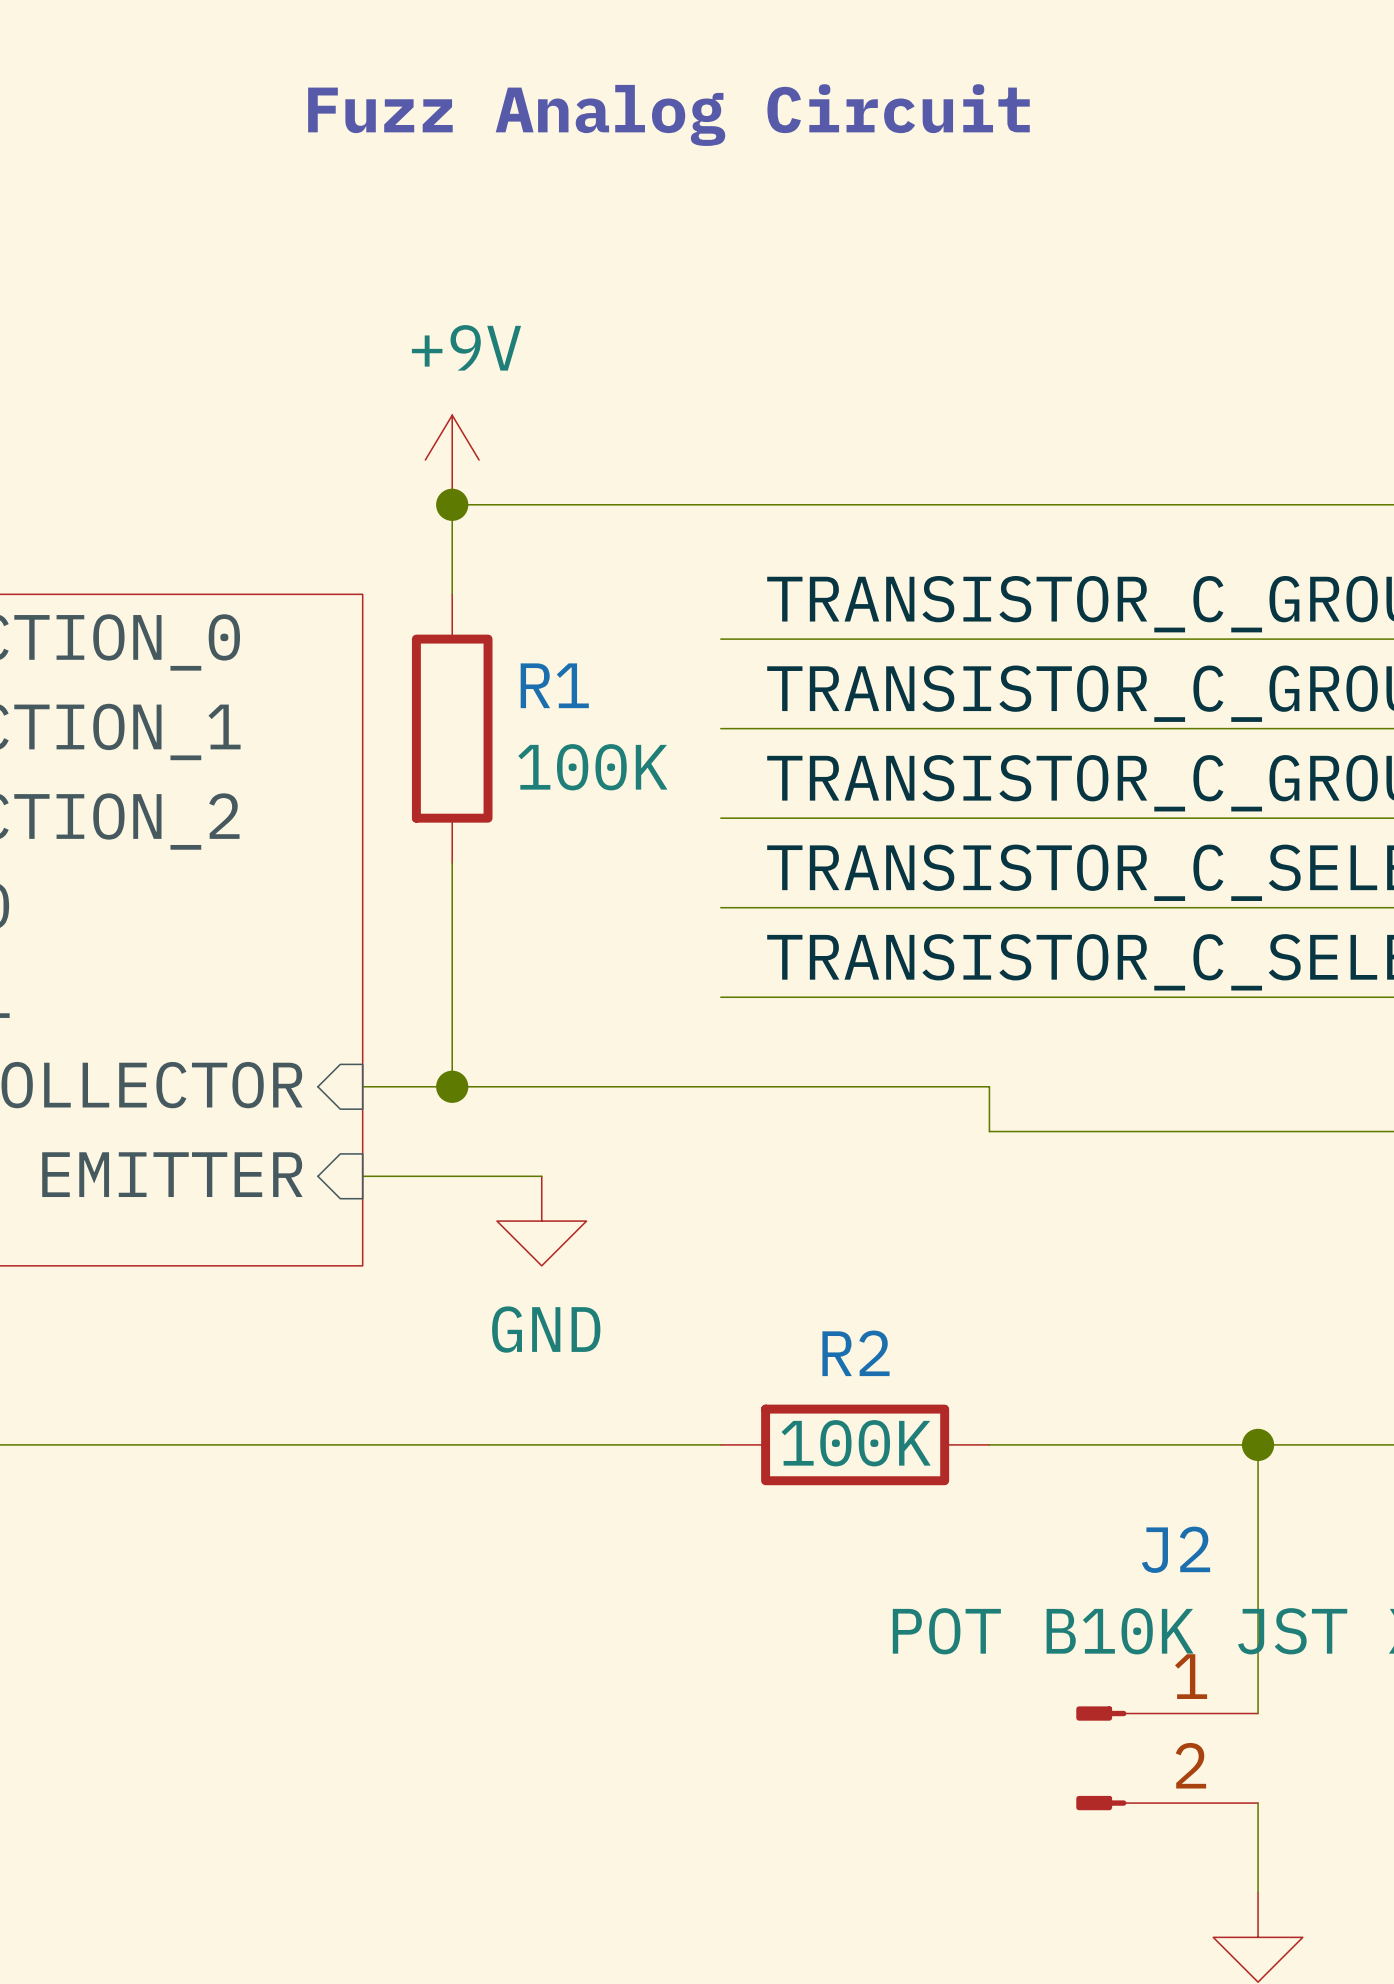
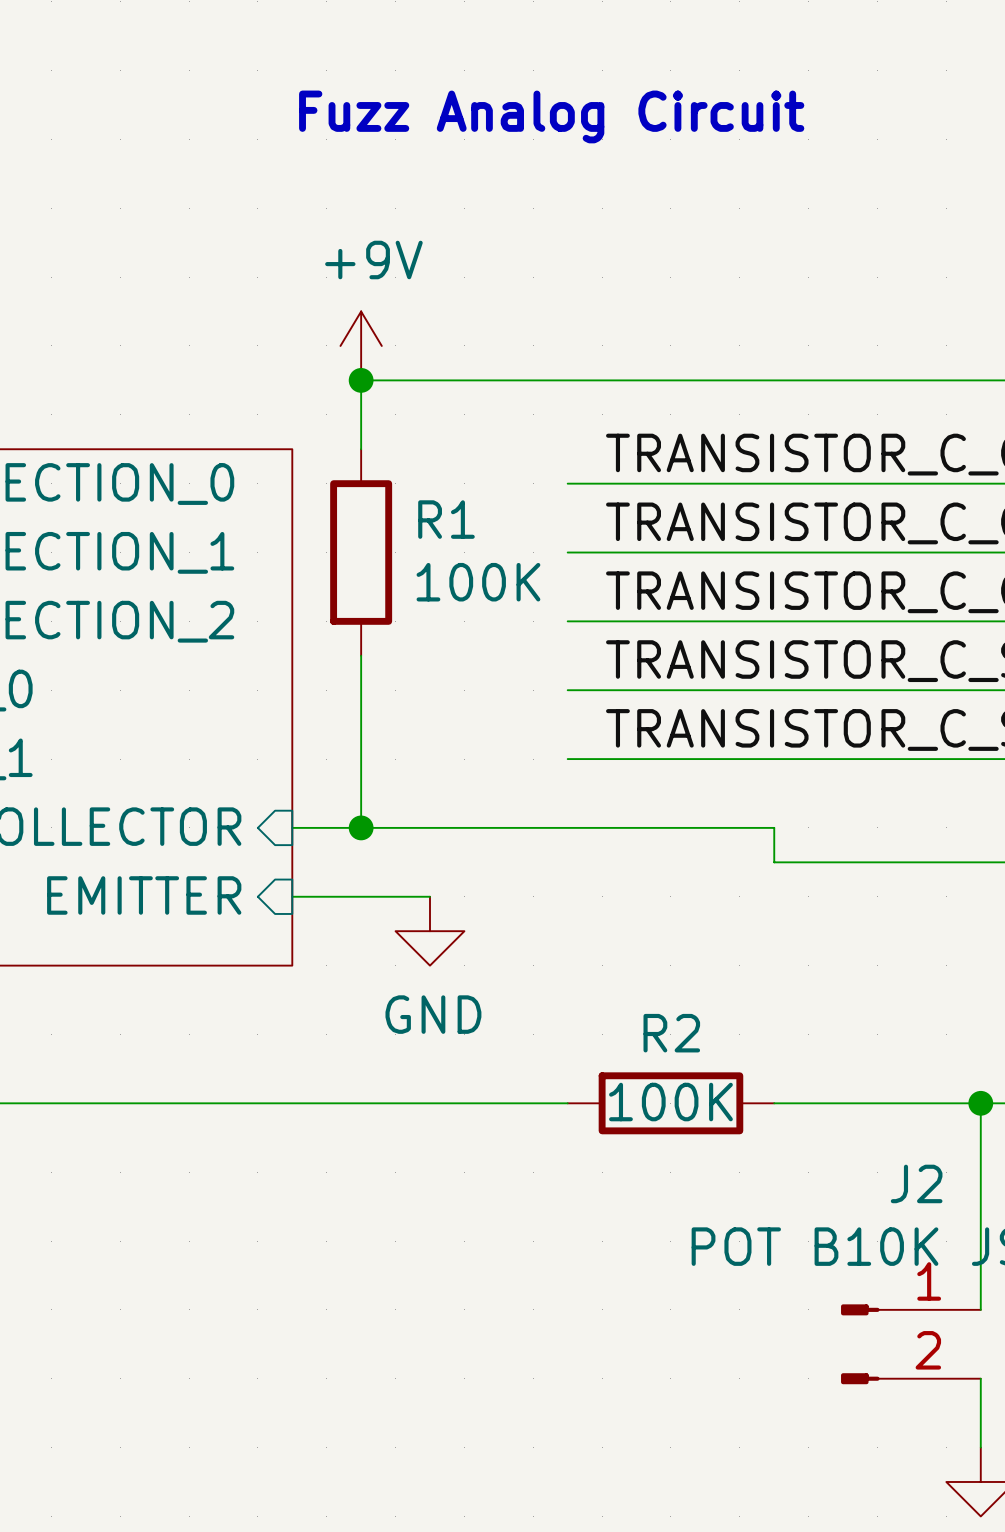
text position: Fuzz Analog Circuit (668, 115) -> Fuzz Analog Circuit (551, 116)

